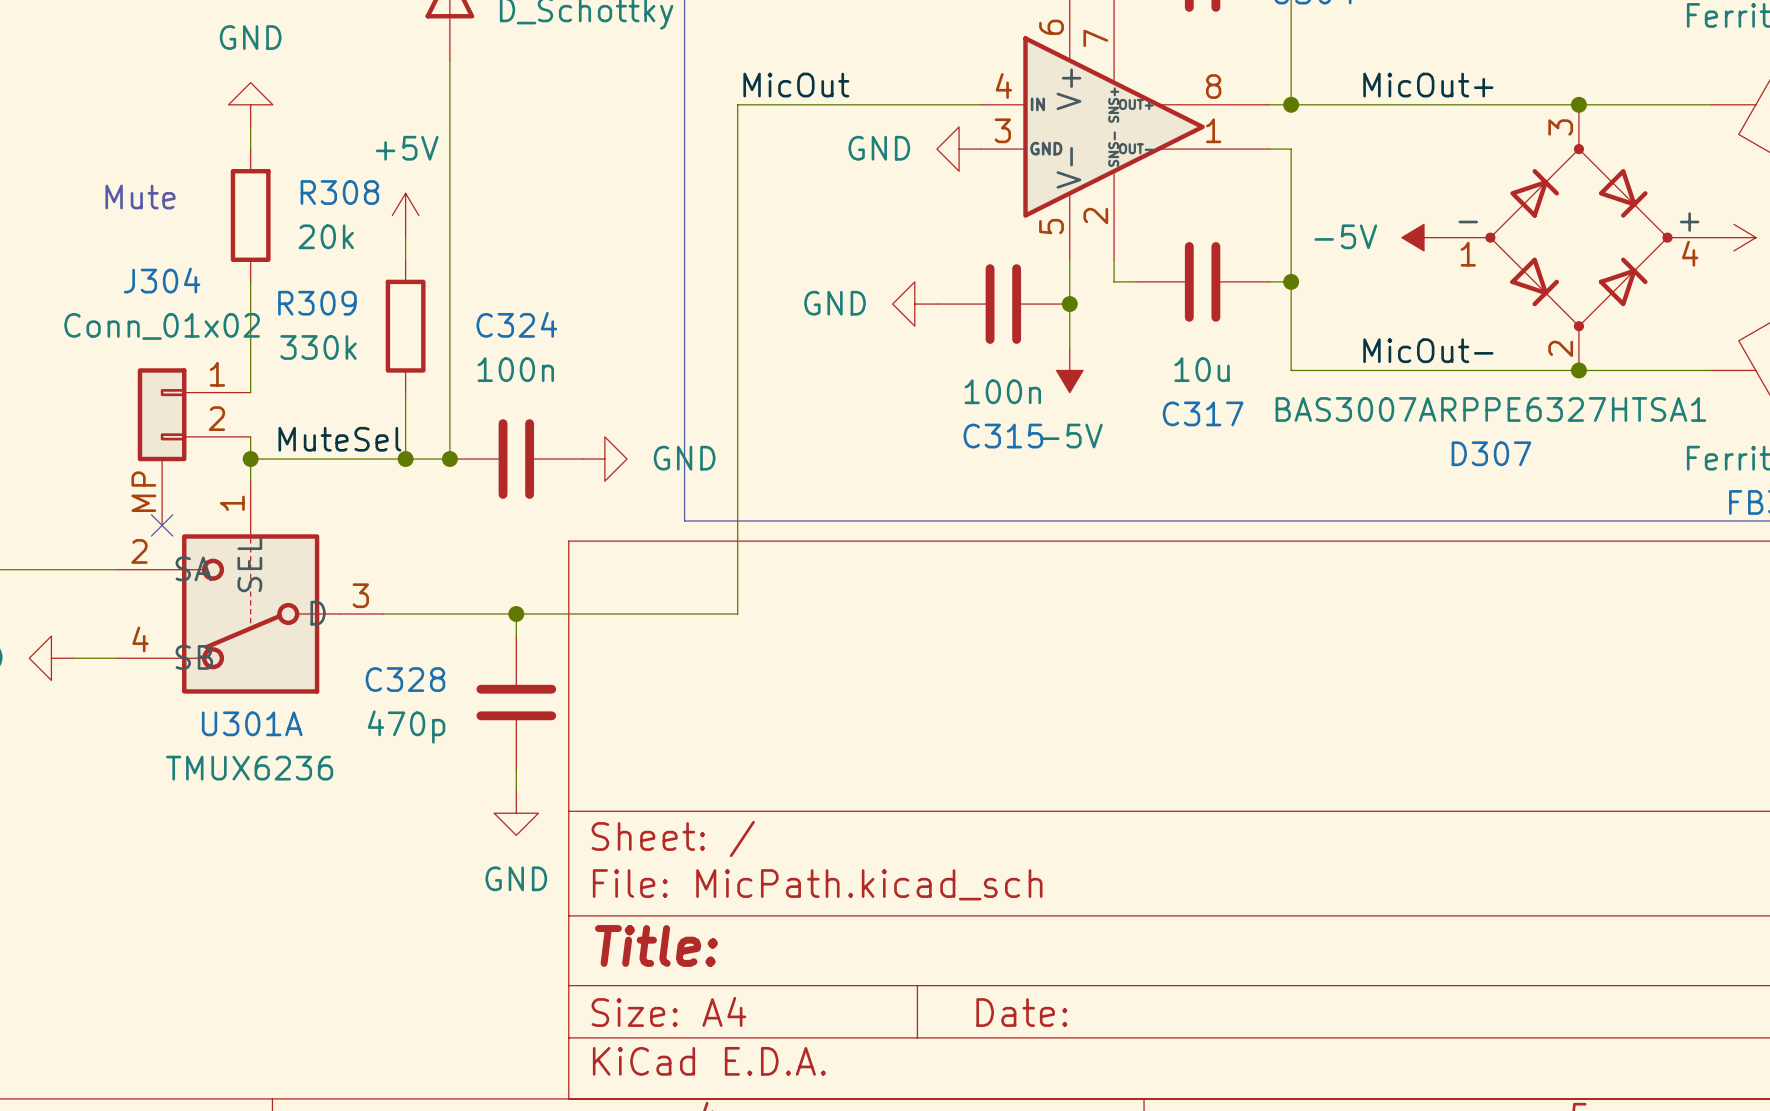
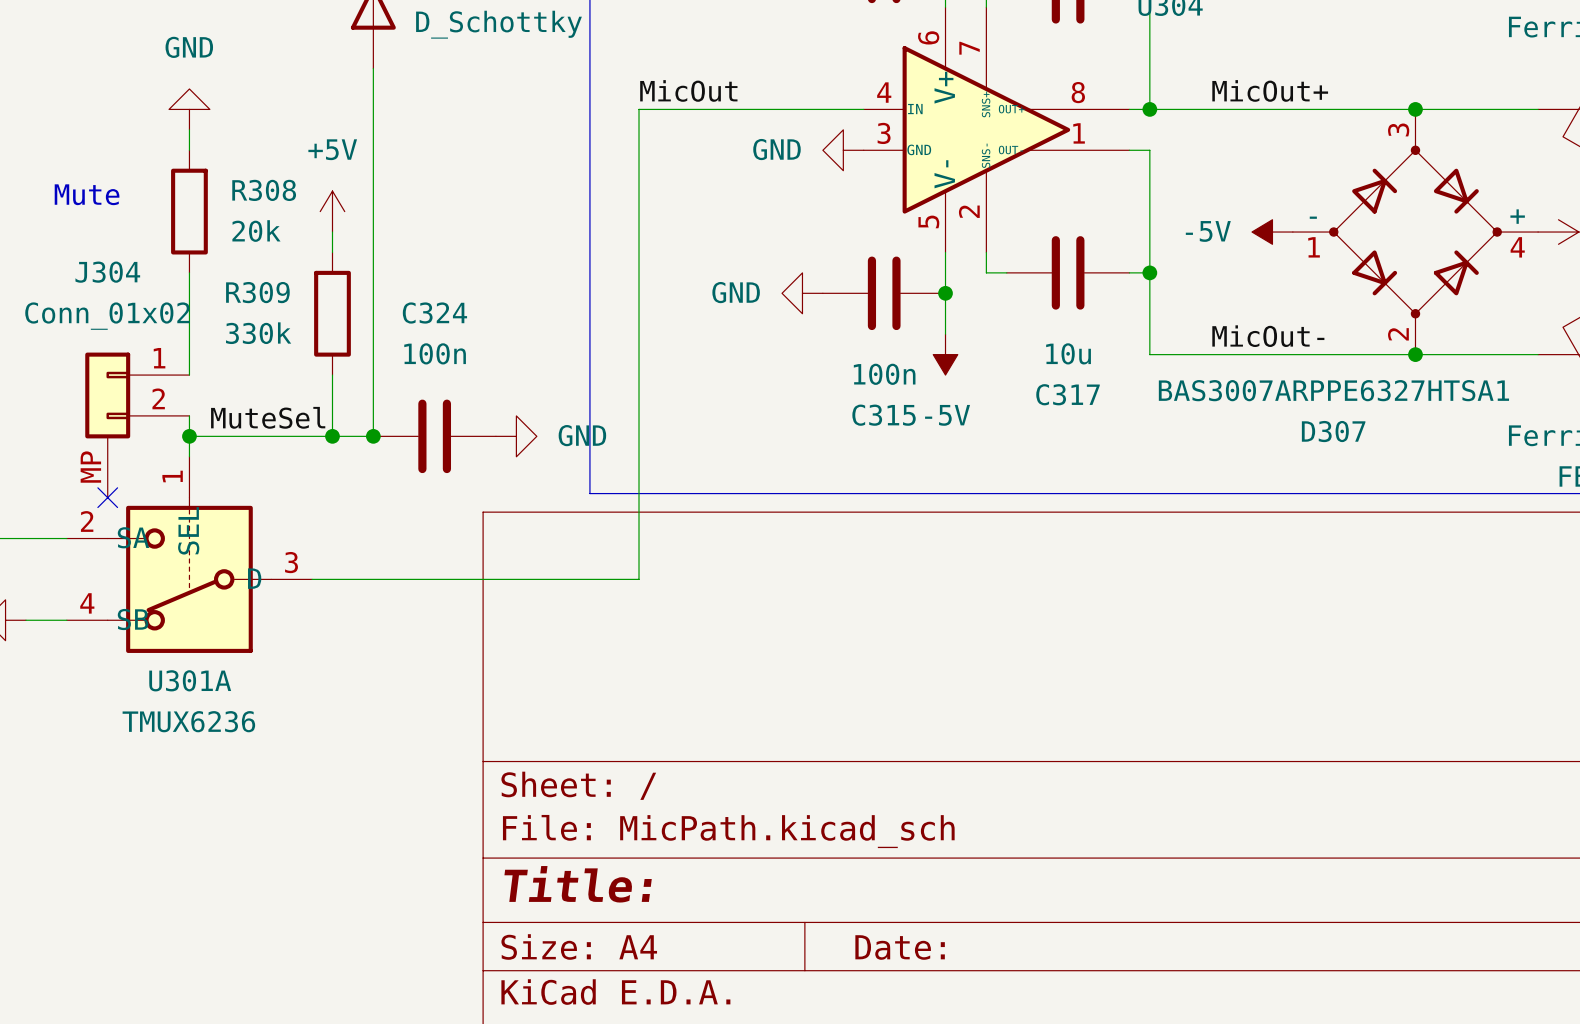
wire: (516, 613) (516, 636) -> none
junction: (516, 613) -> none
C328: 470p (516, 702) -> none
wire: (516, 768) (516, 791) -> none
power symbol: GND (516, 813) -> none

